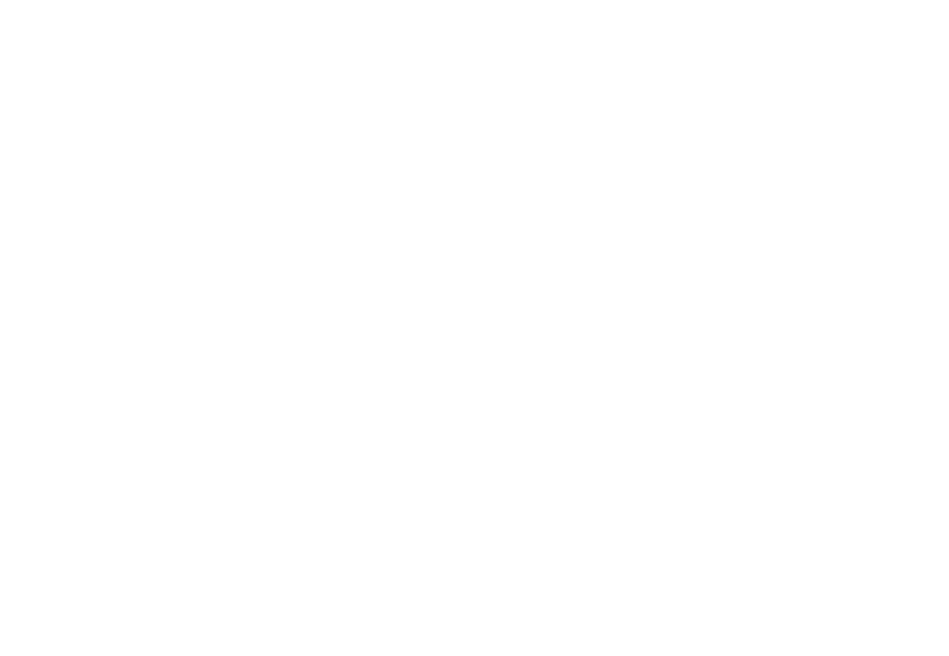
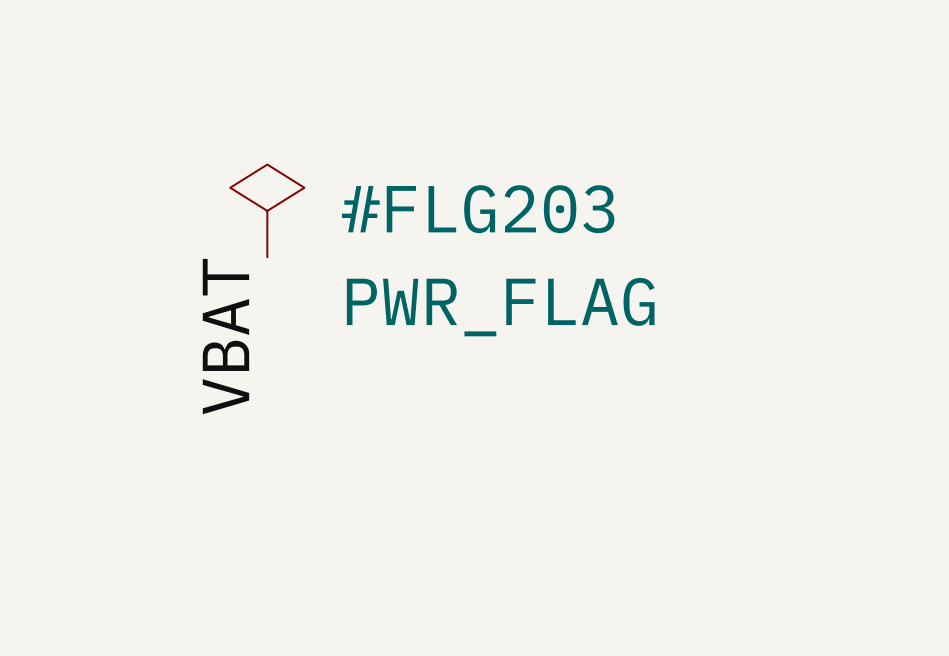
#FLG203: none -> PWR_FLAG (267, 210)
label: none -> VBAT (225, 336)

